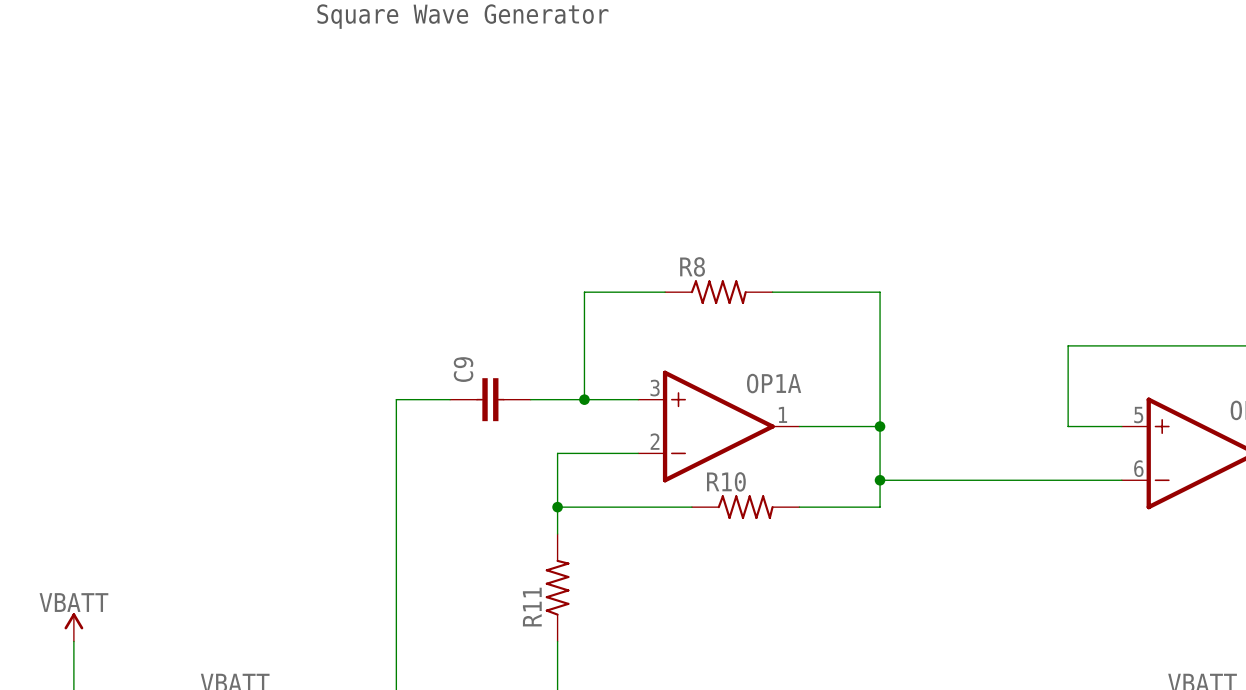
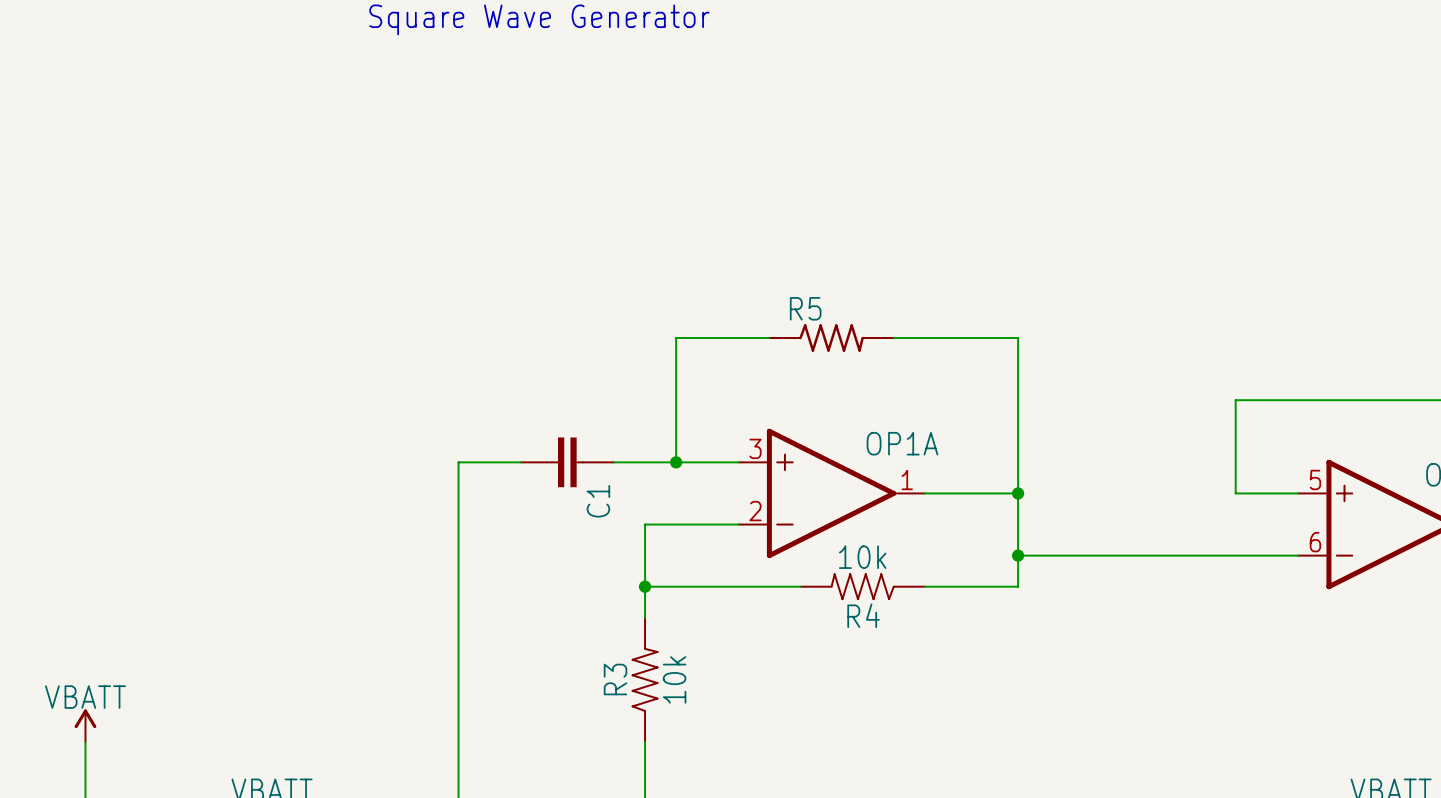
R8 name: R8 (692, 266) -> R5 (805, 308)
C9 name: C9 (463, 369) -> C1 (598, 501)
R10: (745, 507) -> none
R4: none -> 10k (862, 586)
R11: (557, 587) -> none
R3: none -> 10k (645, 679)

